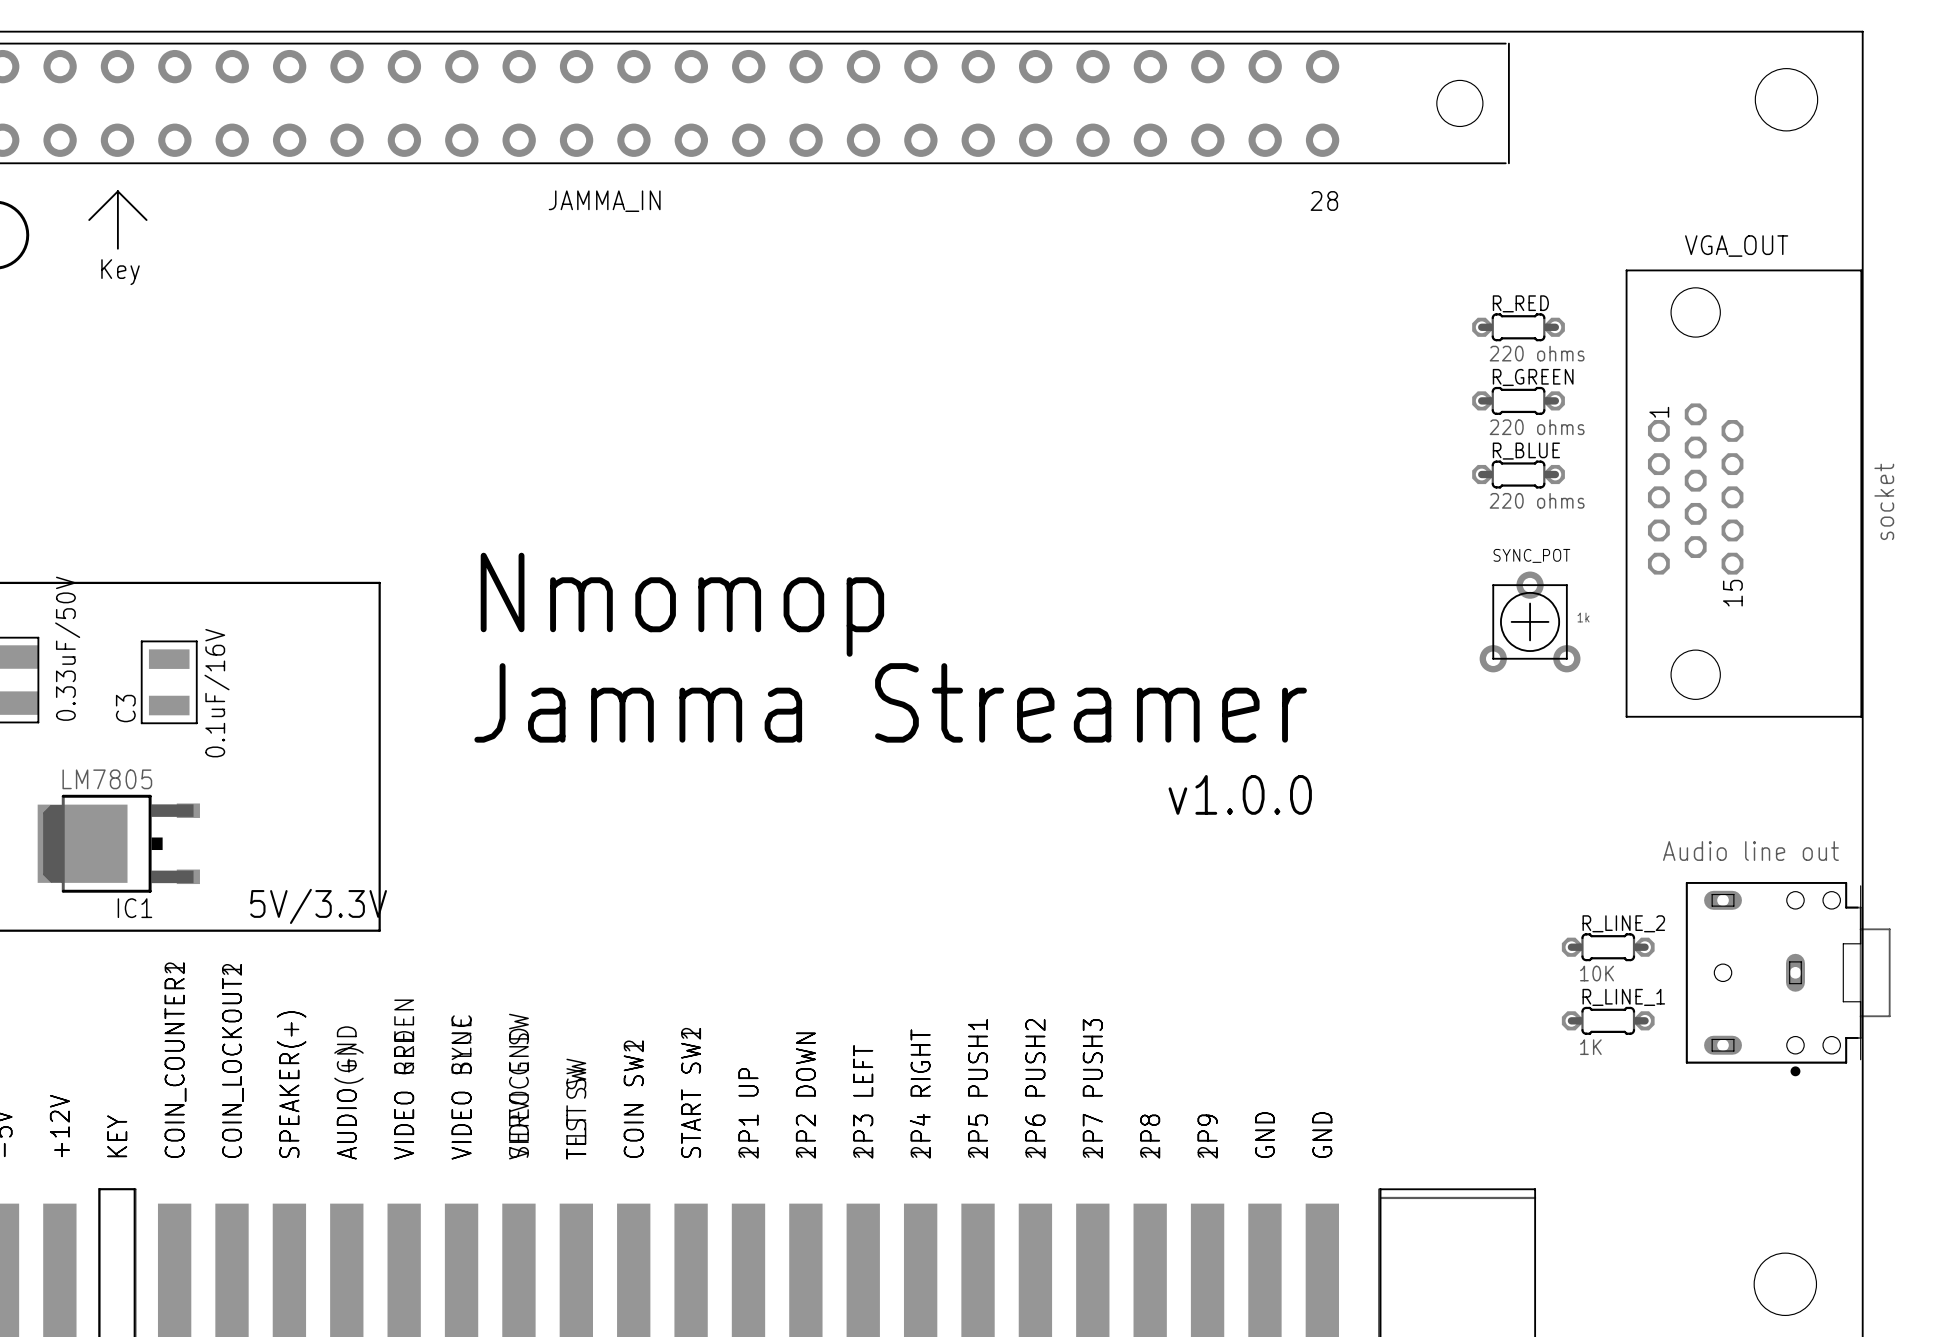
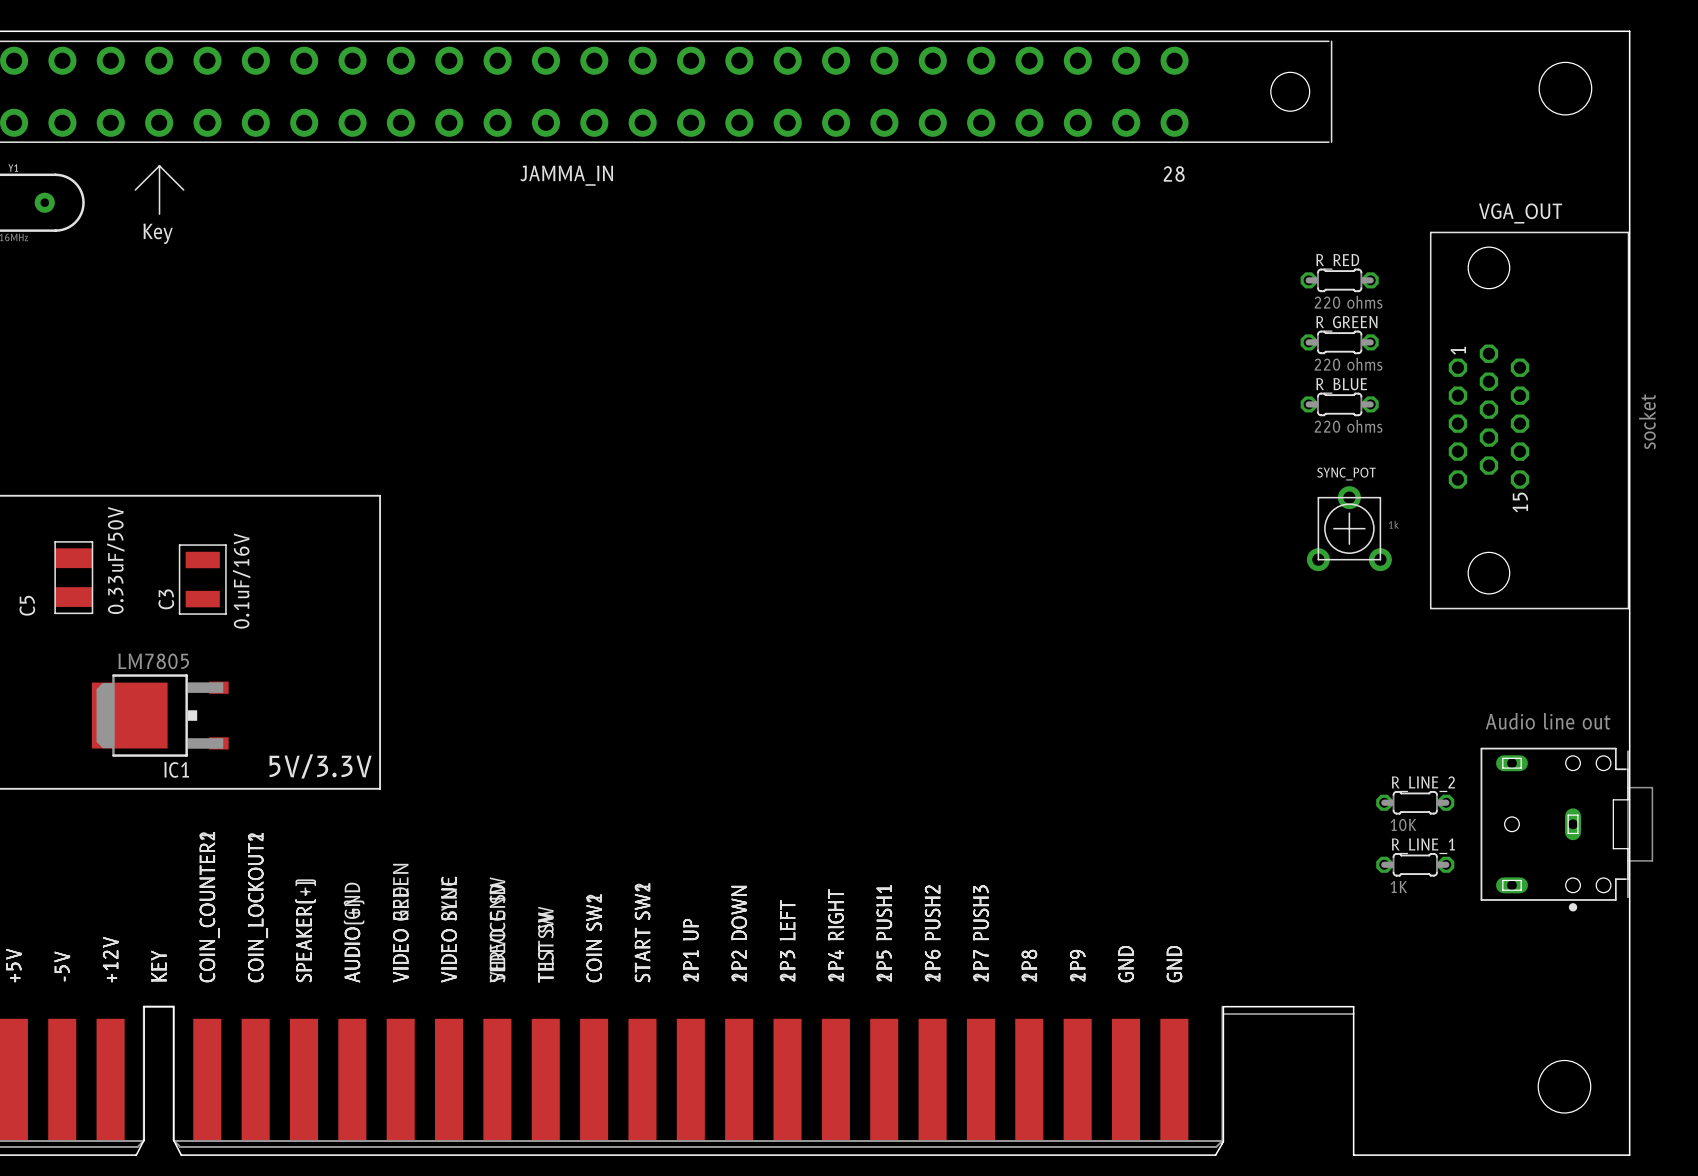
text: Nmomop (682, 604) -> none
text: Jamma Streamer (890, 702) -> none
text: v1.0.0 (1240, 794) -> none

